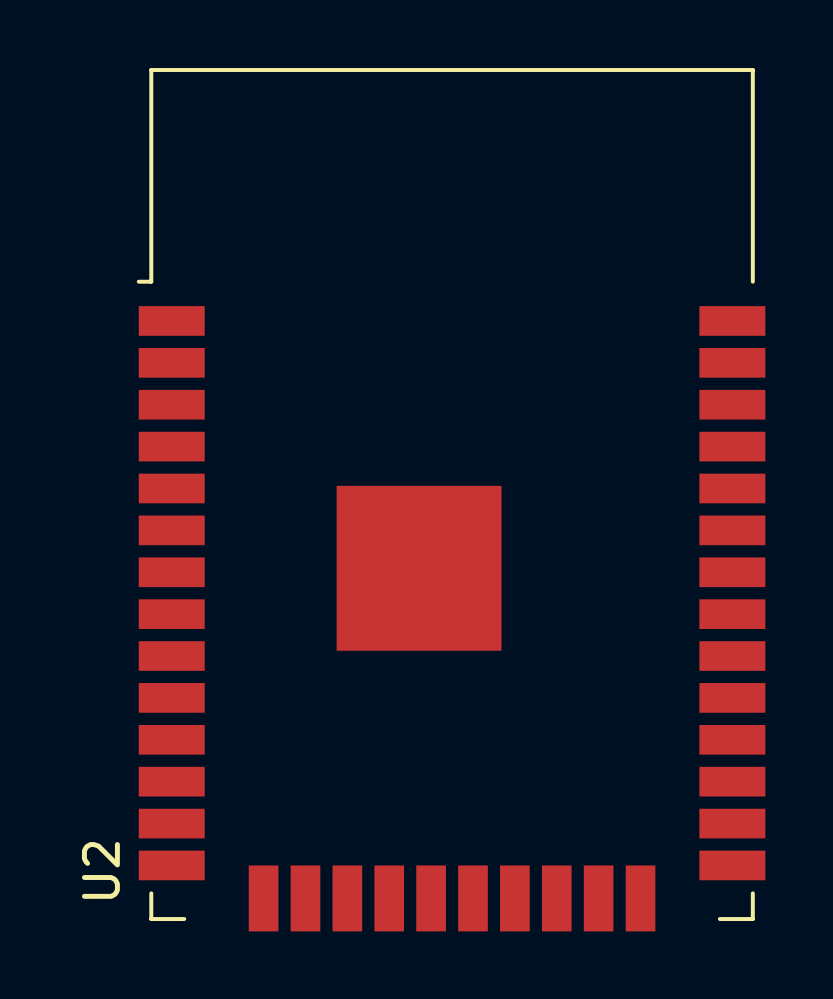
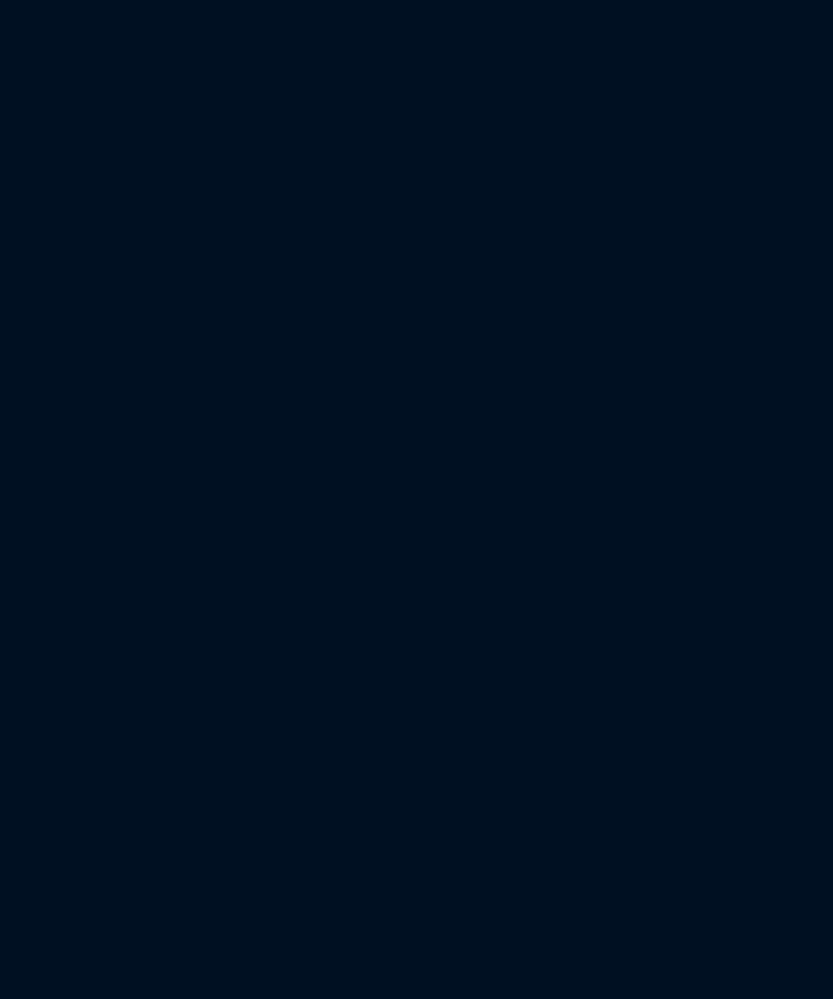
U2: (451, 499) -> none

